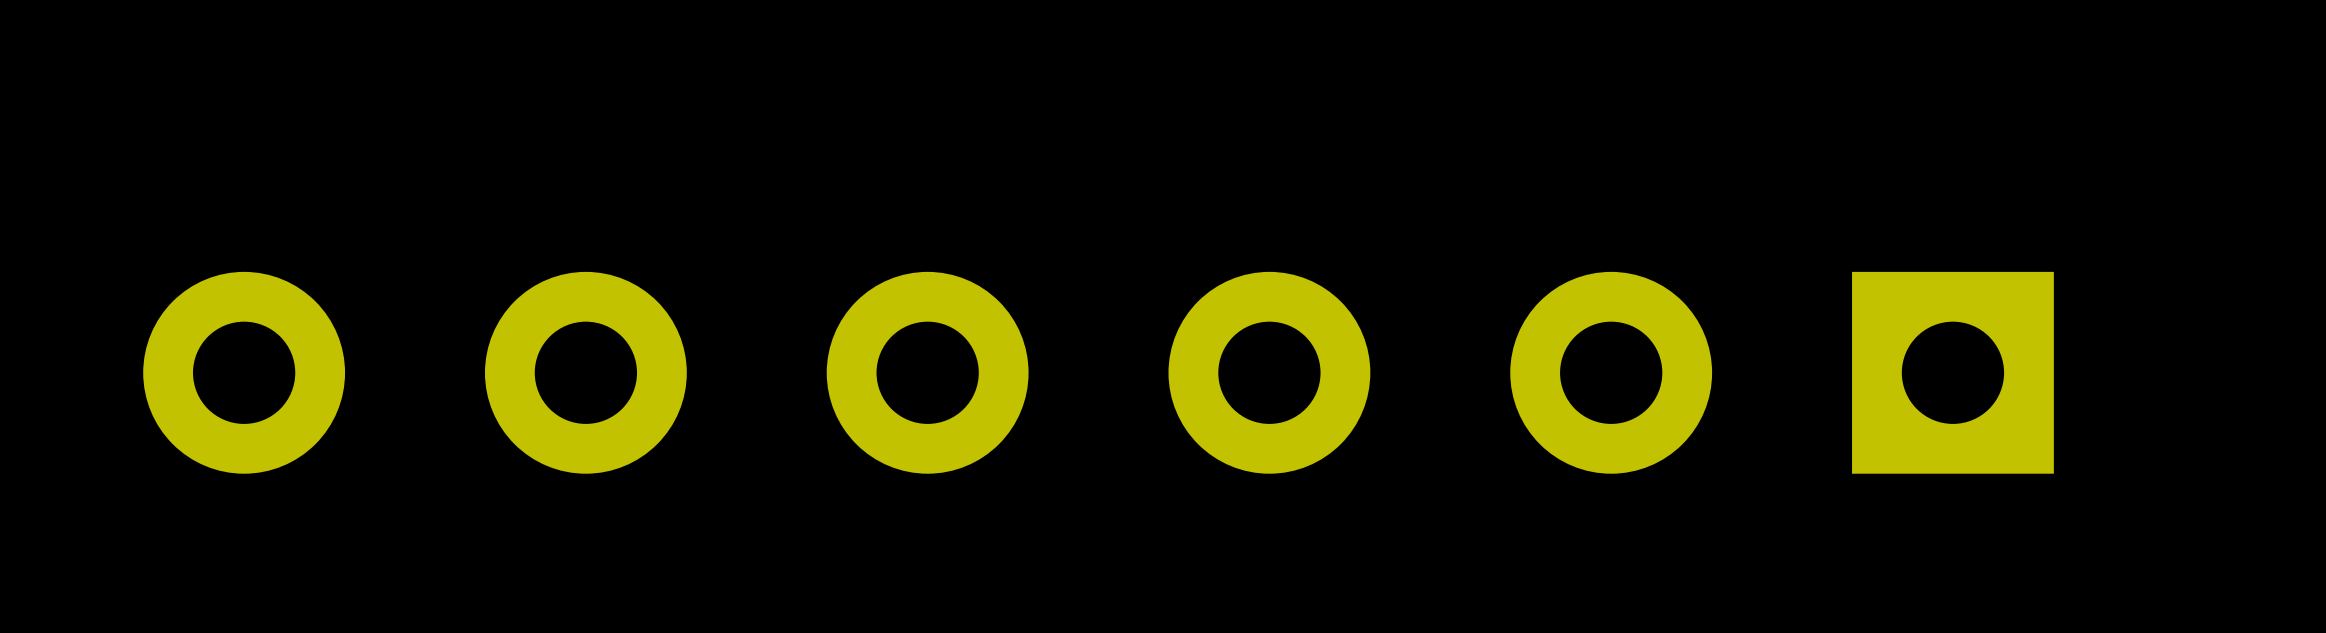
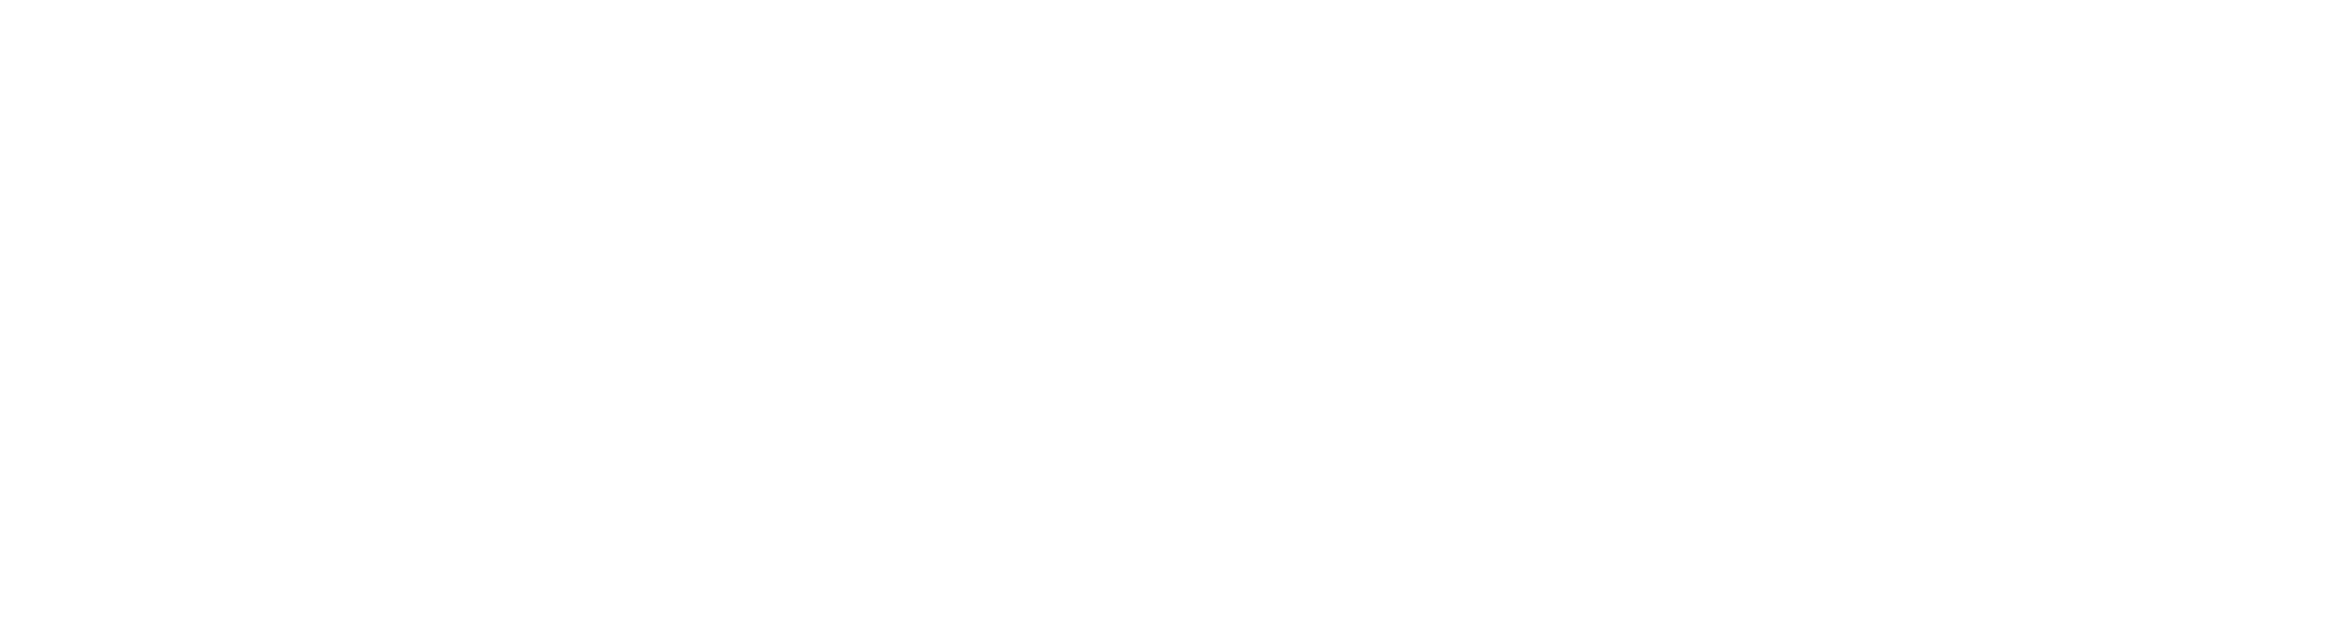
part: (1098, 372) -> none

